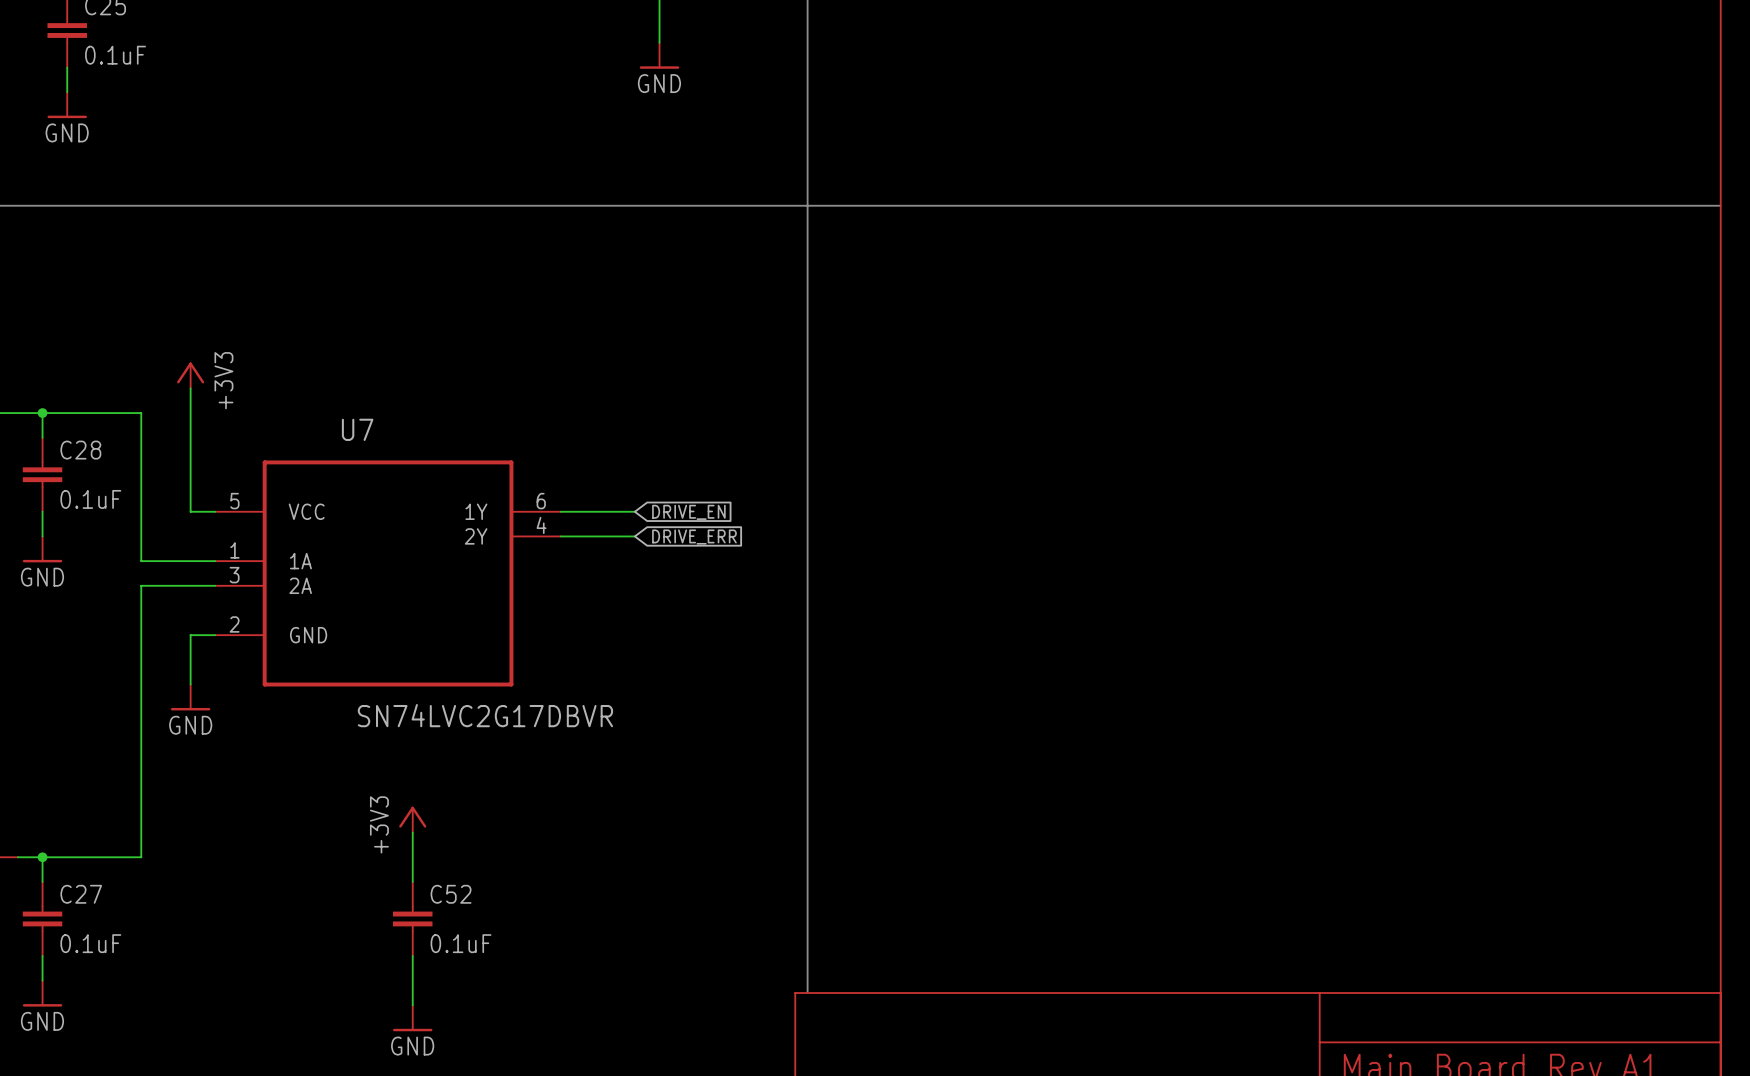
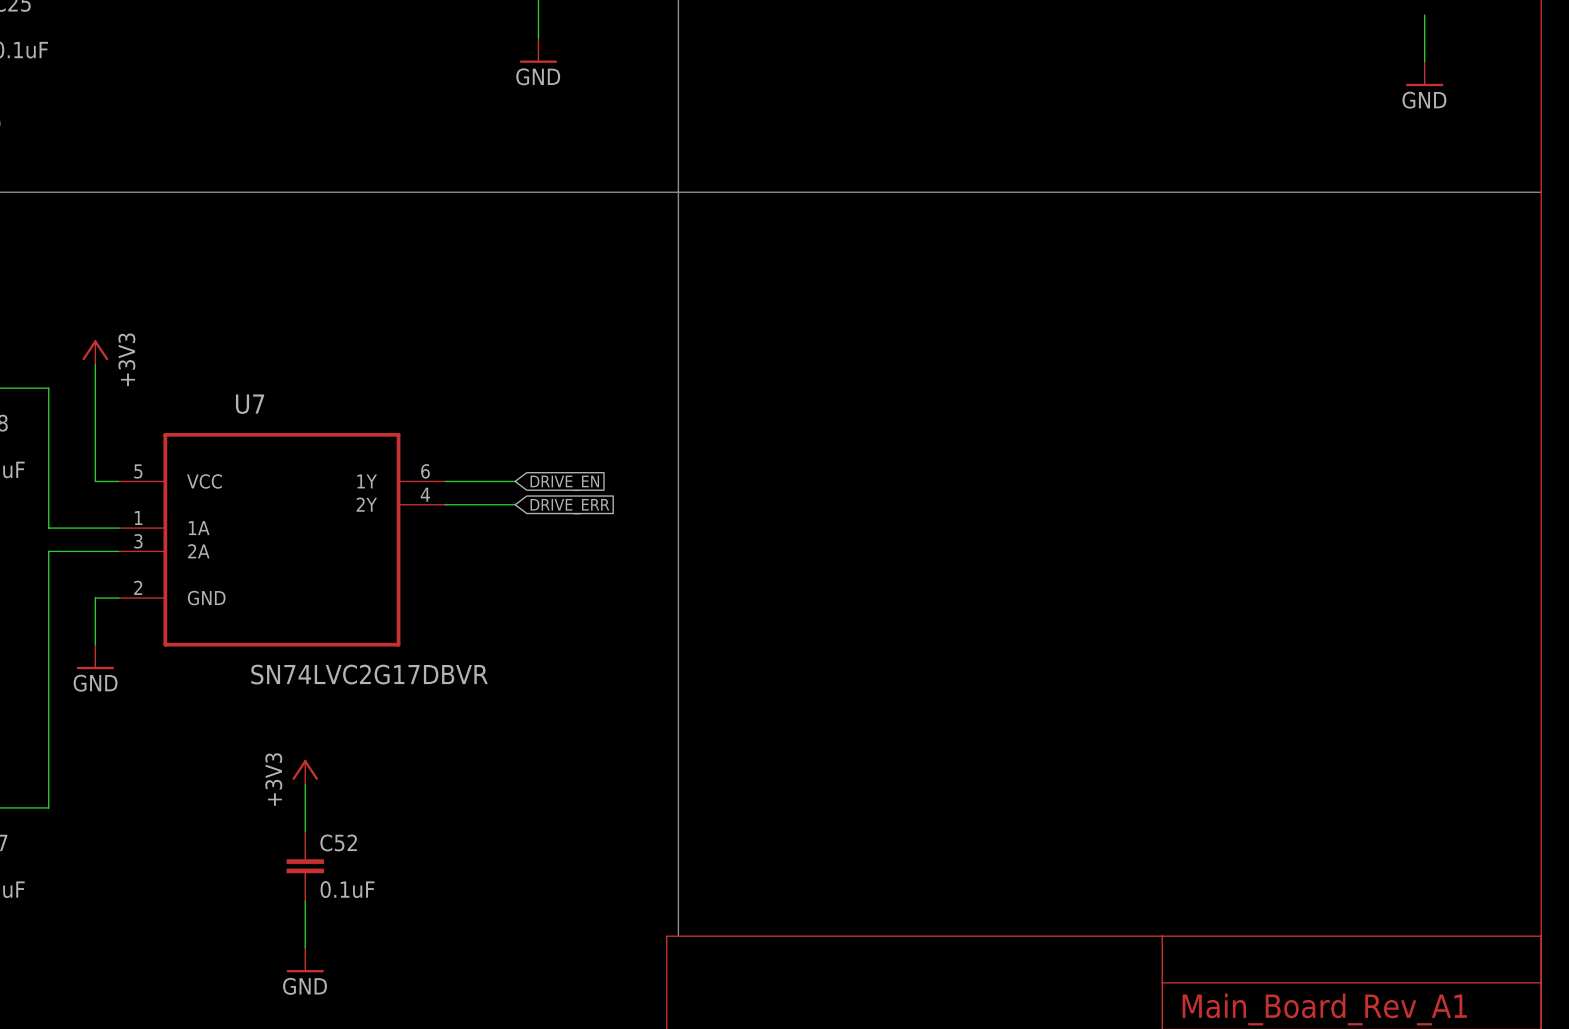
wire: none -> (1424, 15) (1424, 61)
power symbol: none -> GND (1424, 73)

